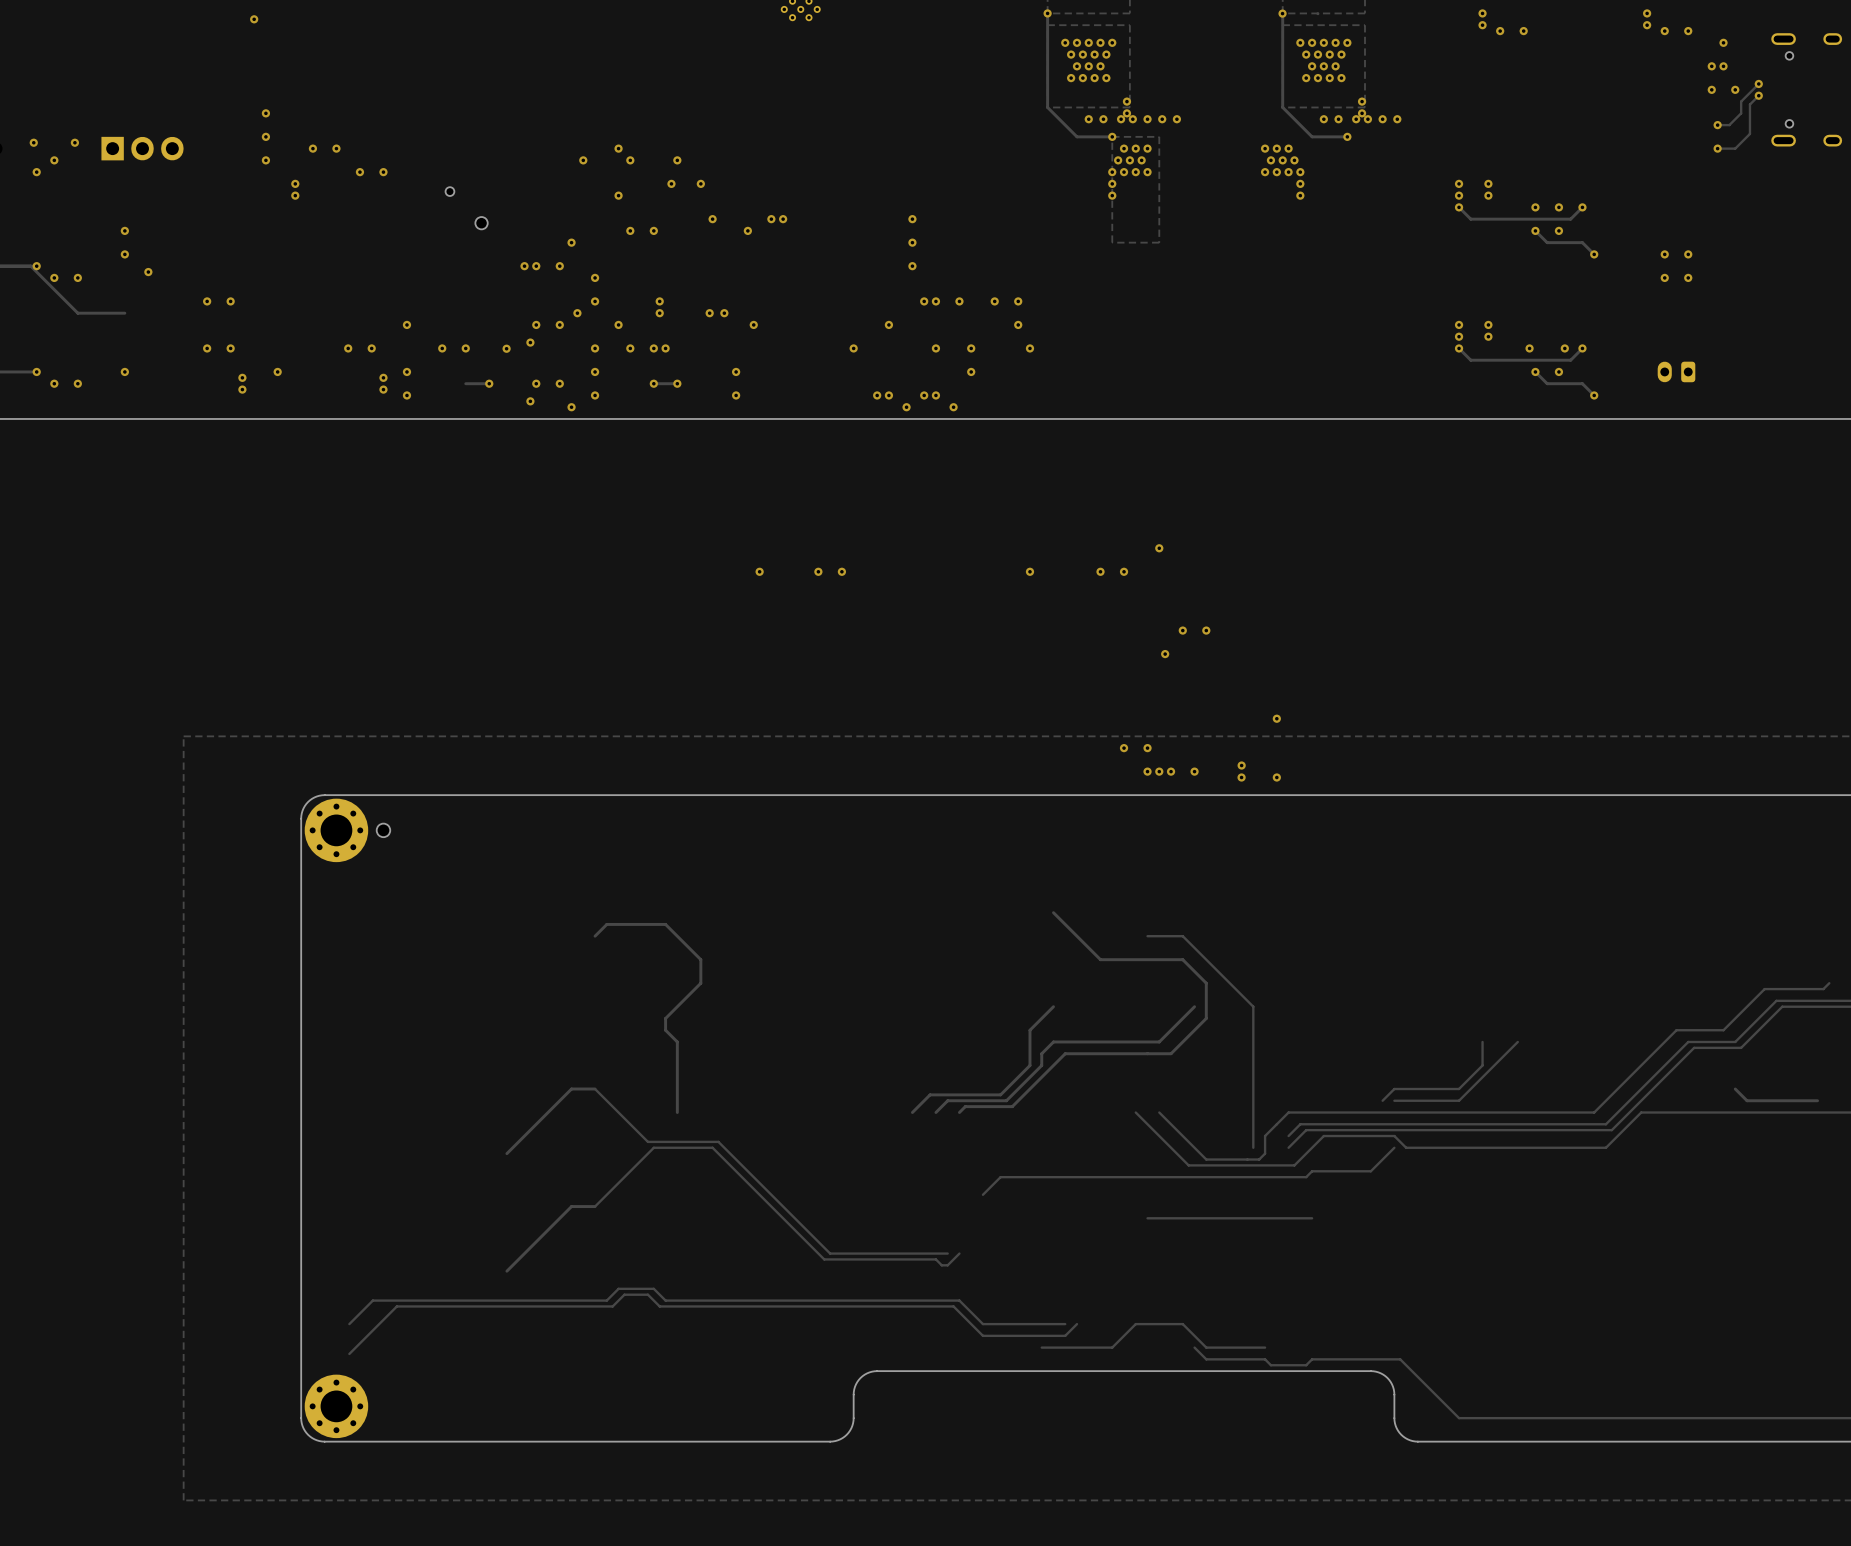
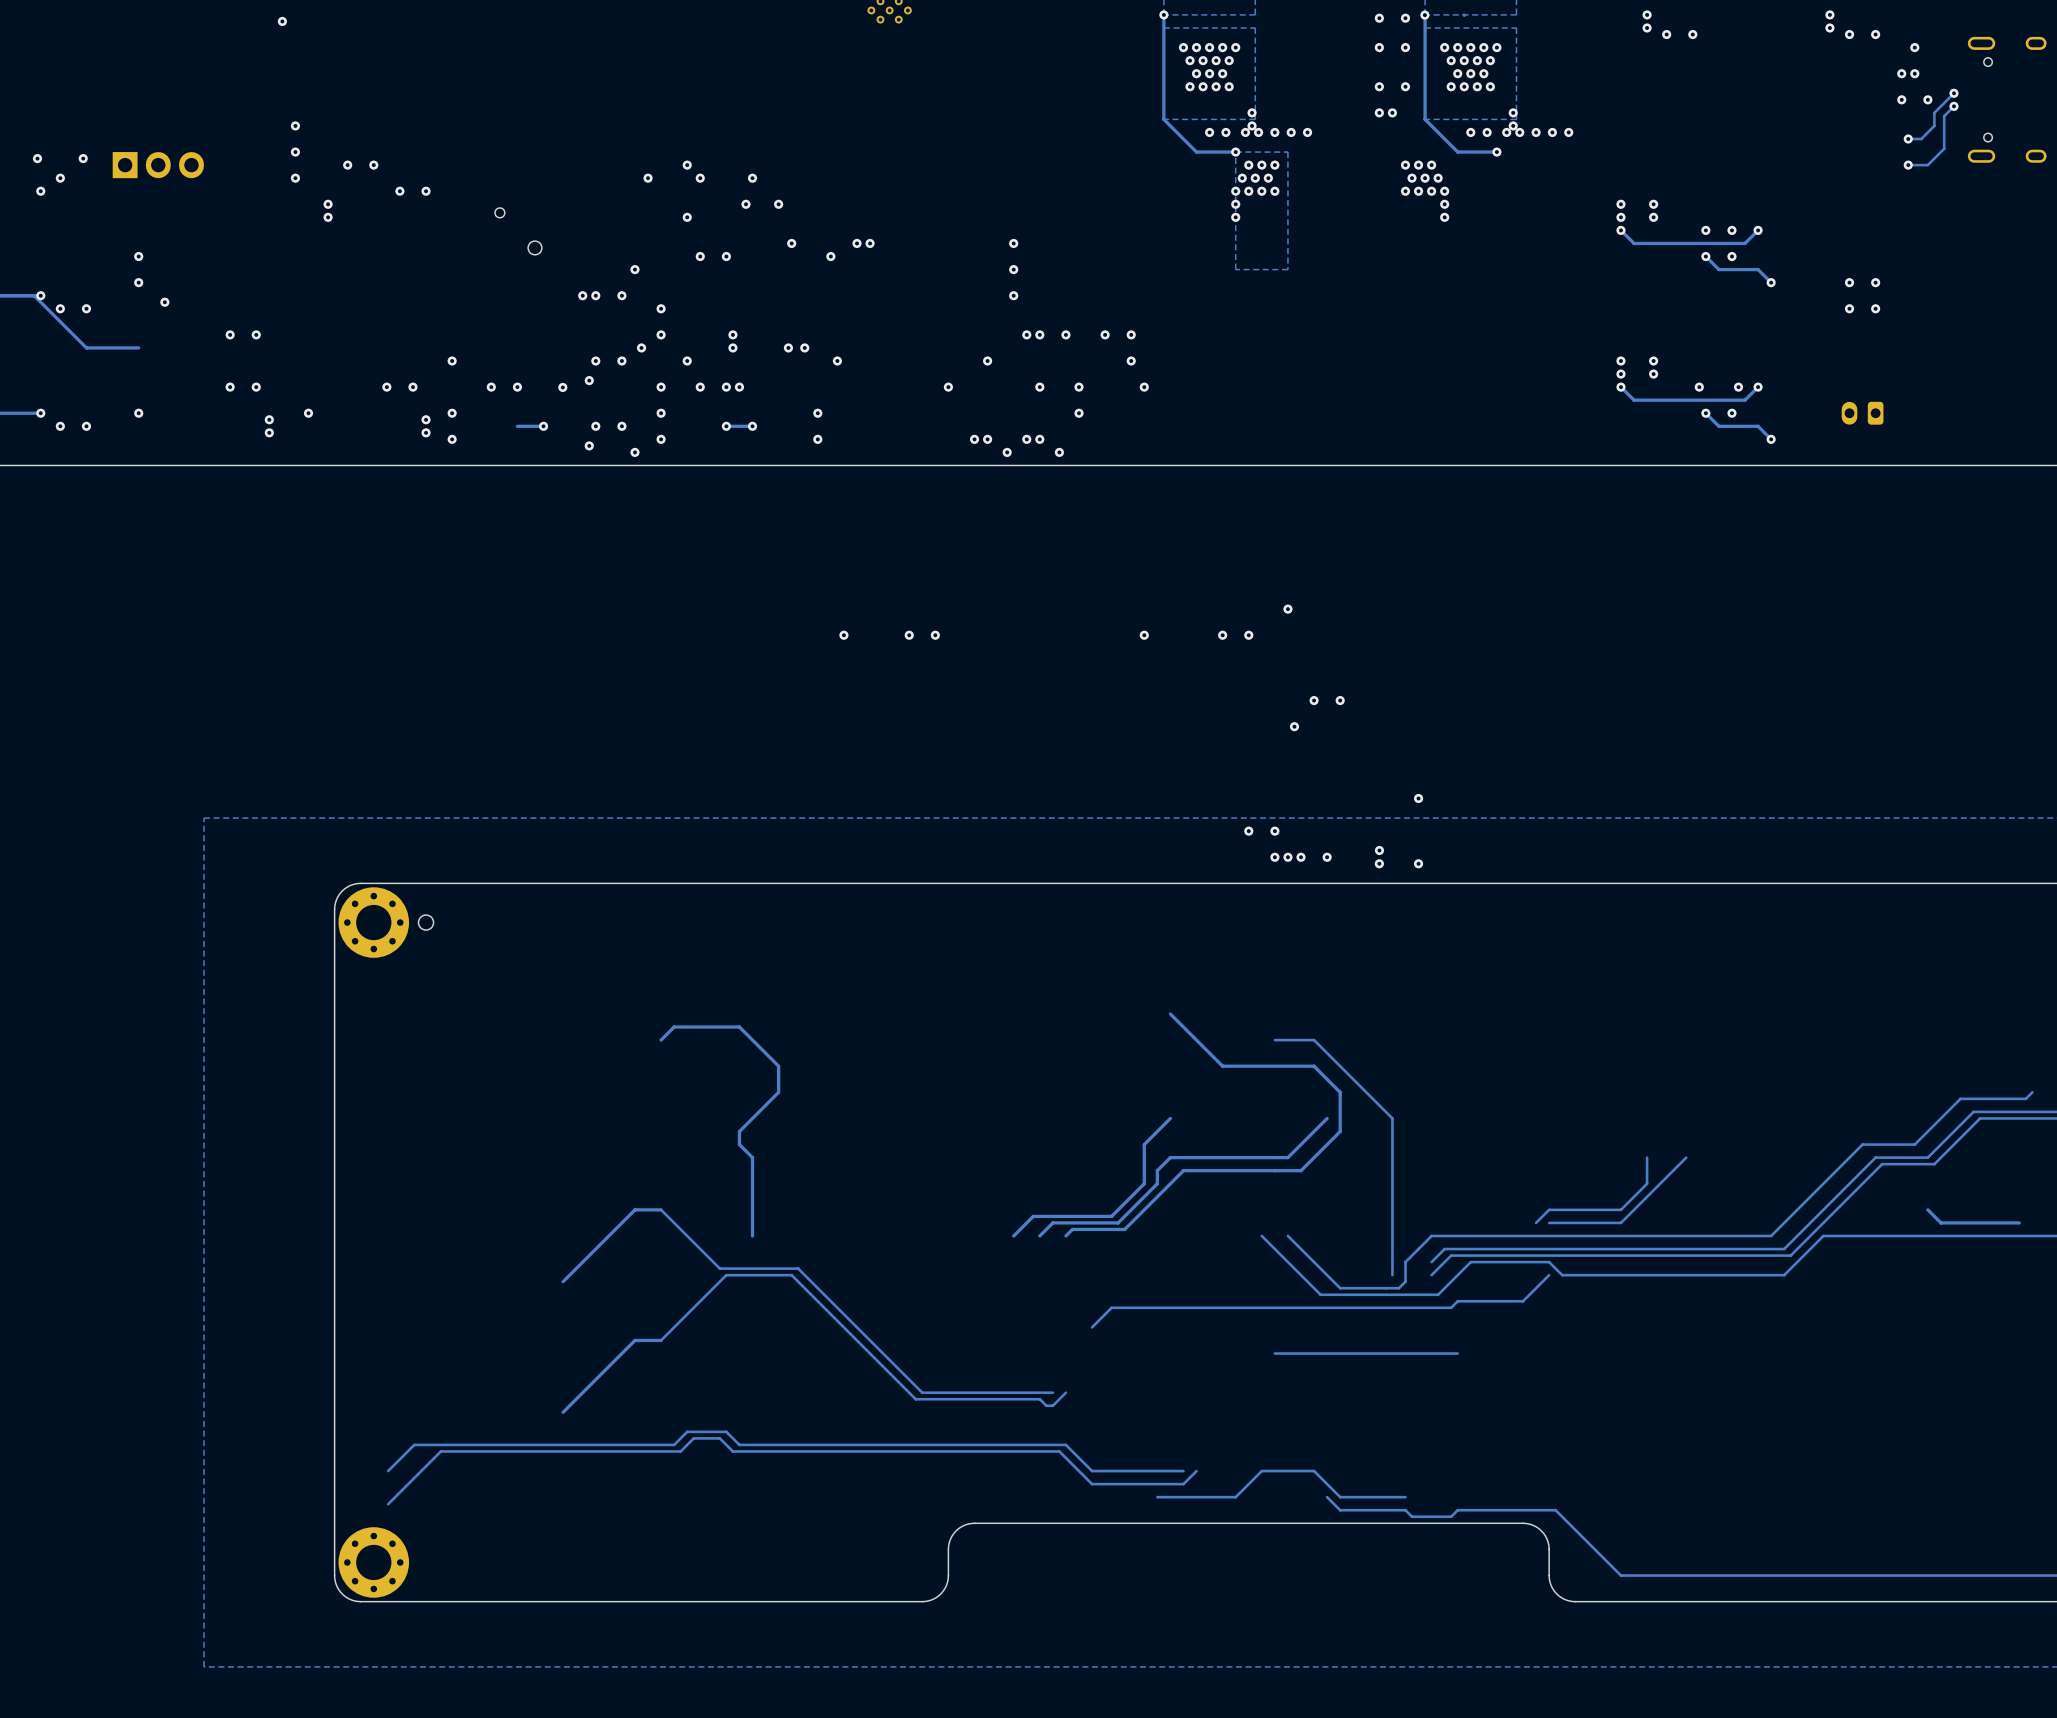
via: none -> (1379, 18)
via: none -> (1405, 18)
via: none -> (1379, 47)
via: none -> (1405, 47)
via: none -> (1379, 86)
via: none -> (1405, 86)
via: none -> (1379, 112)
via: none -> (1392, 112)
via: none -> (1568, 132)

